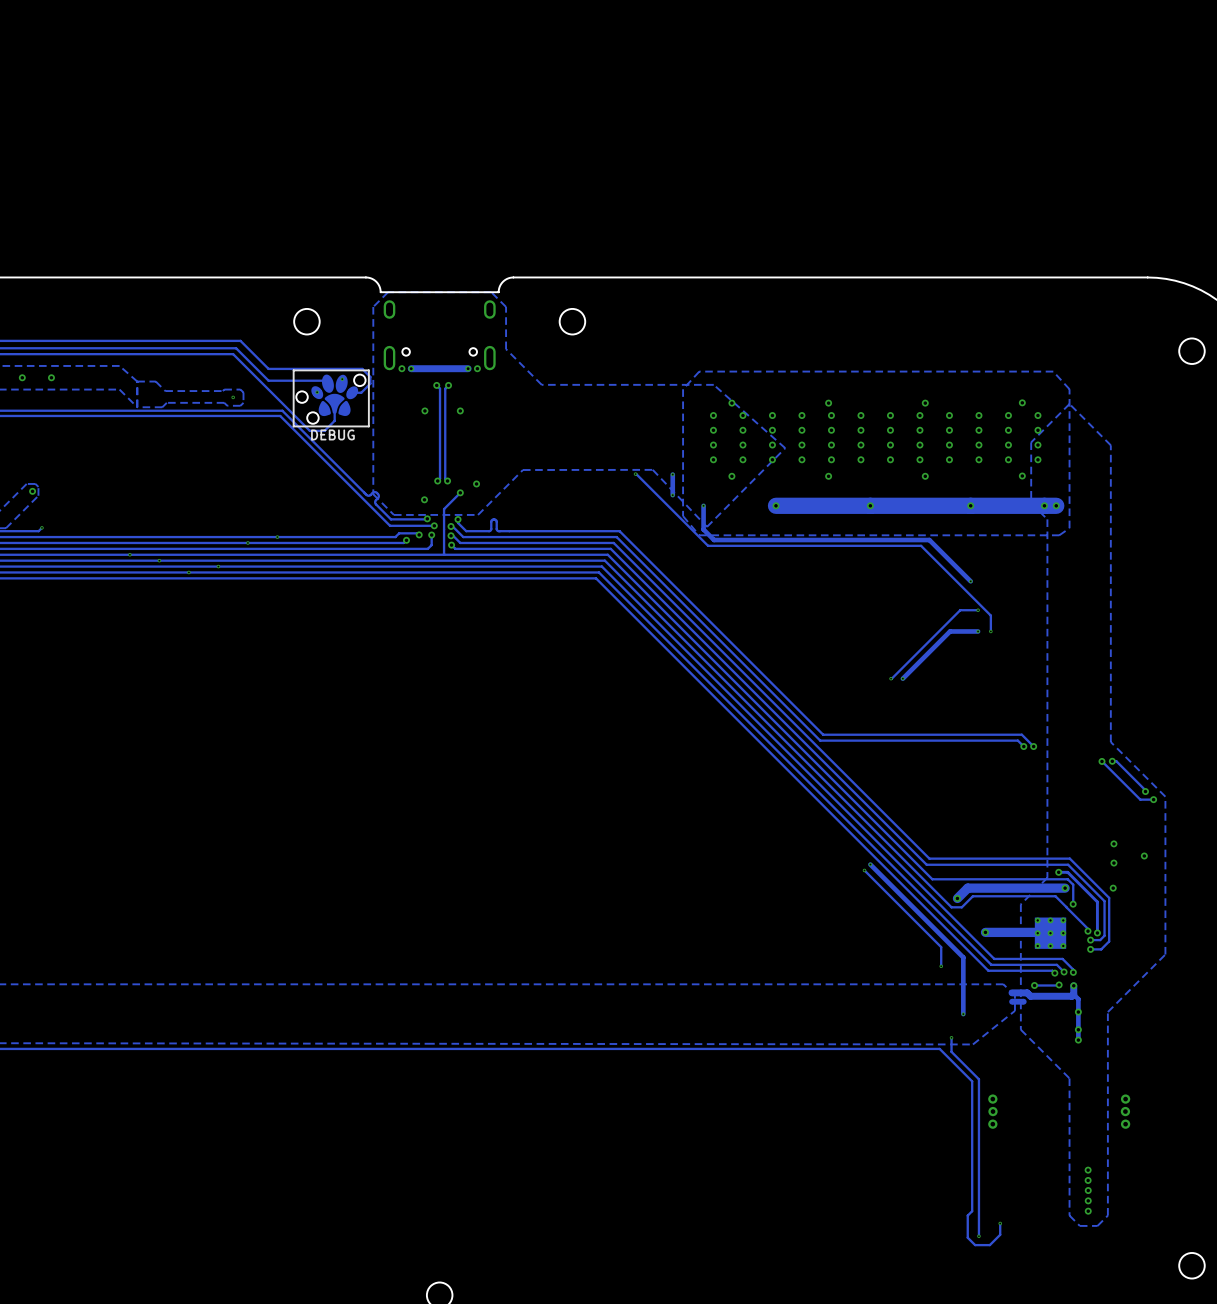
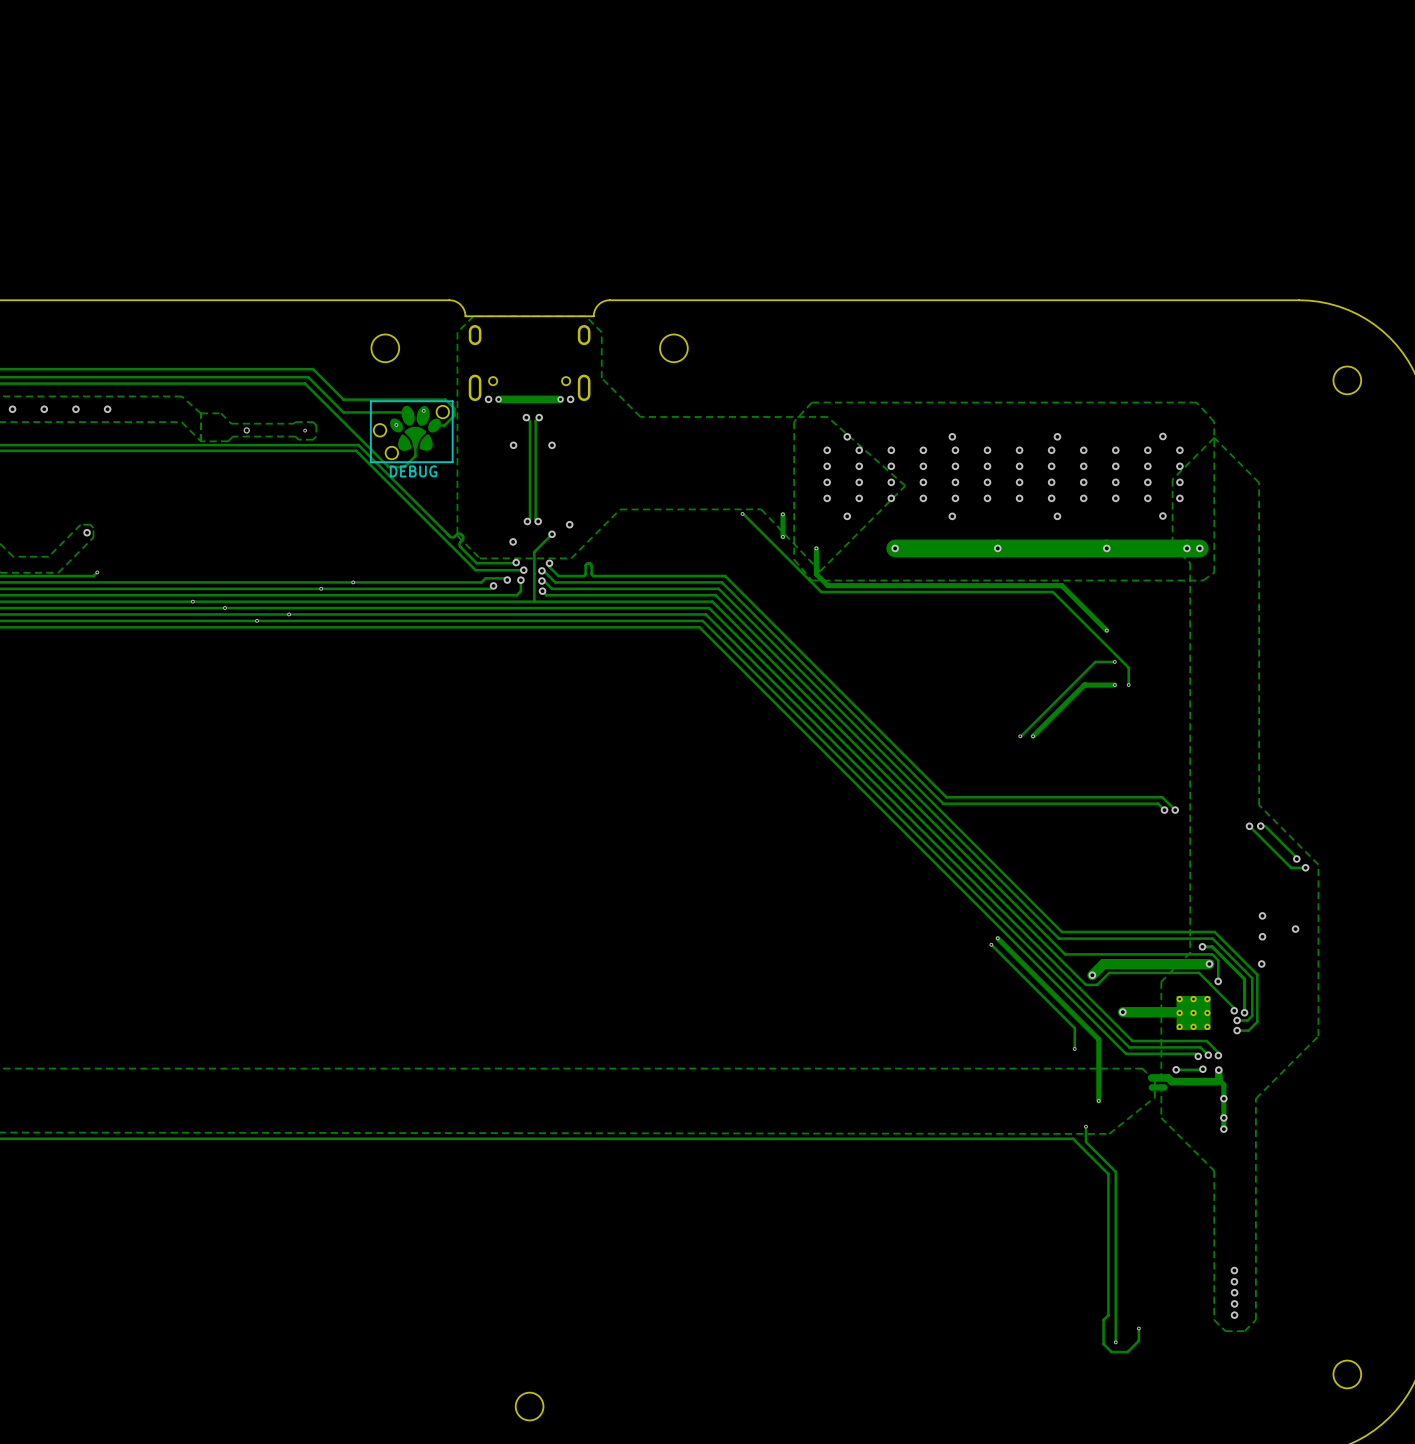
via: none -> (246, 430)
via: (992, 1099) -> none
via: (1125, 1099) -> none
via: (993, 1111) -> none
via: (1125, 1111) -> none
via: (992, 1124) -> none
via: (1125, 1124) -> none

